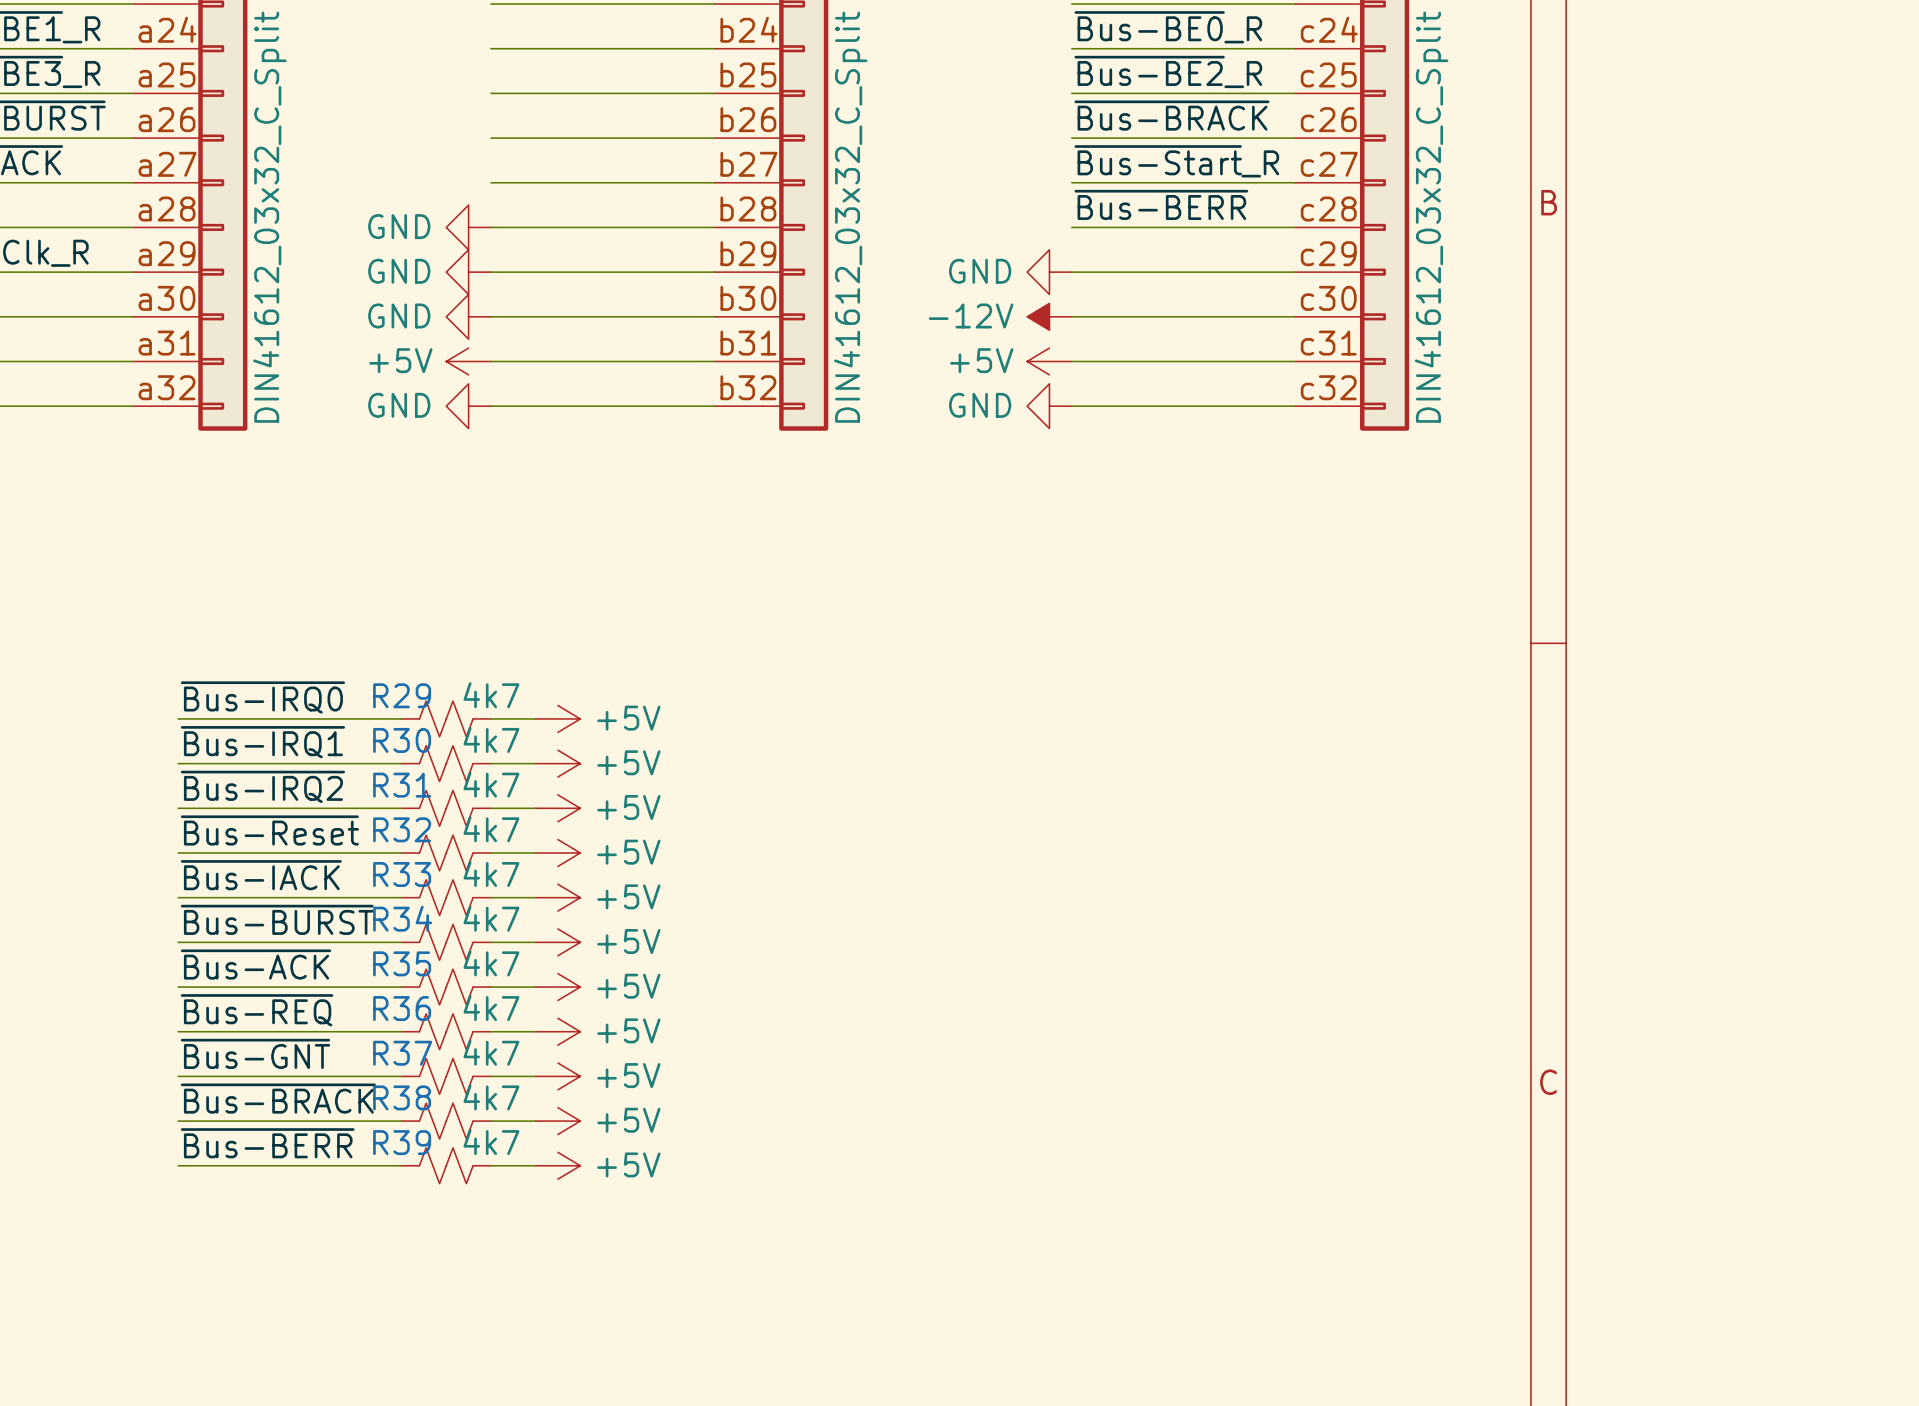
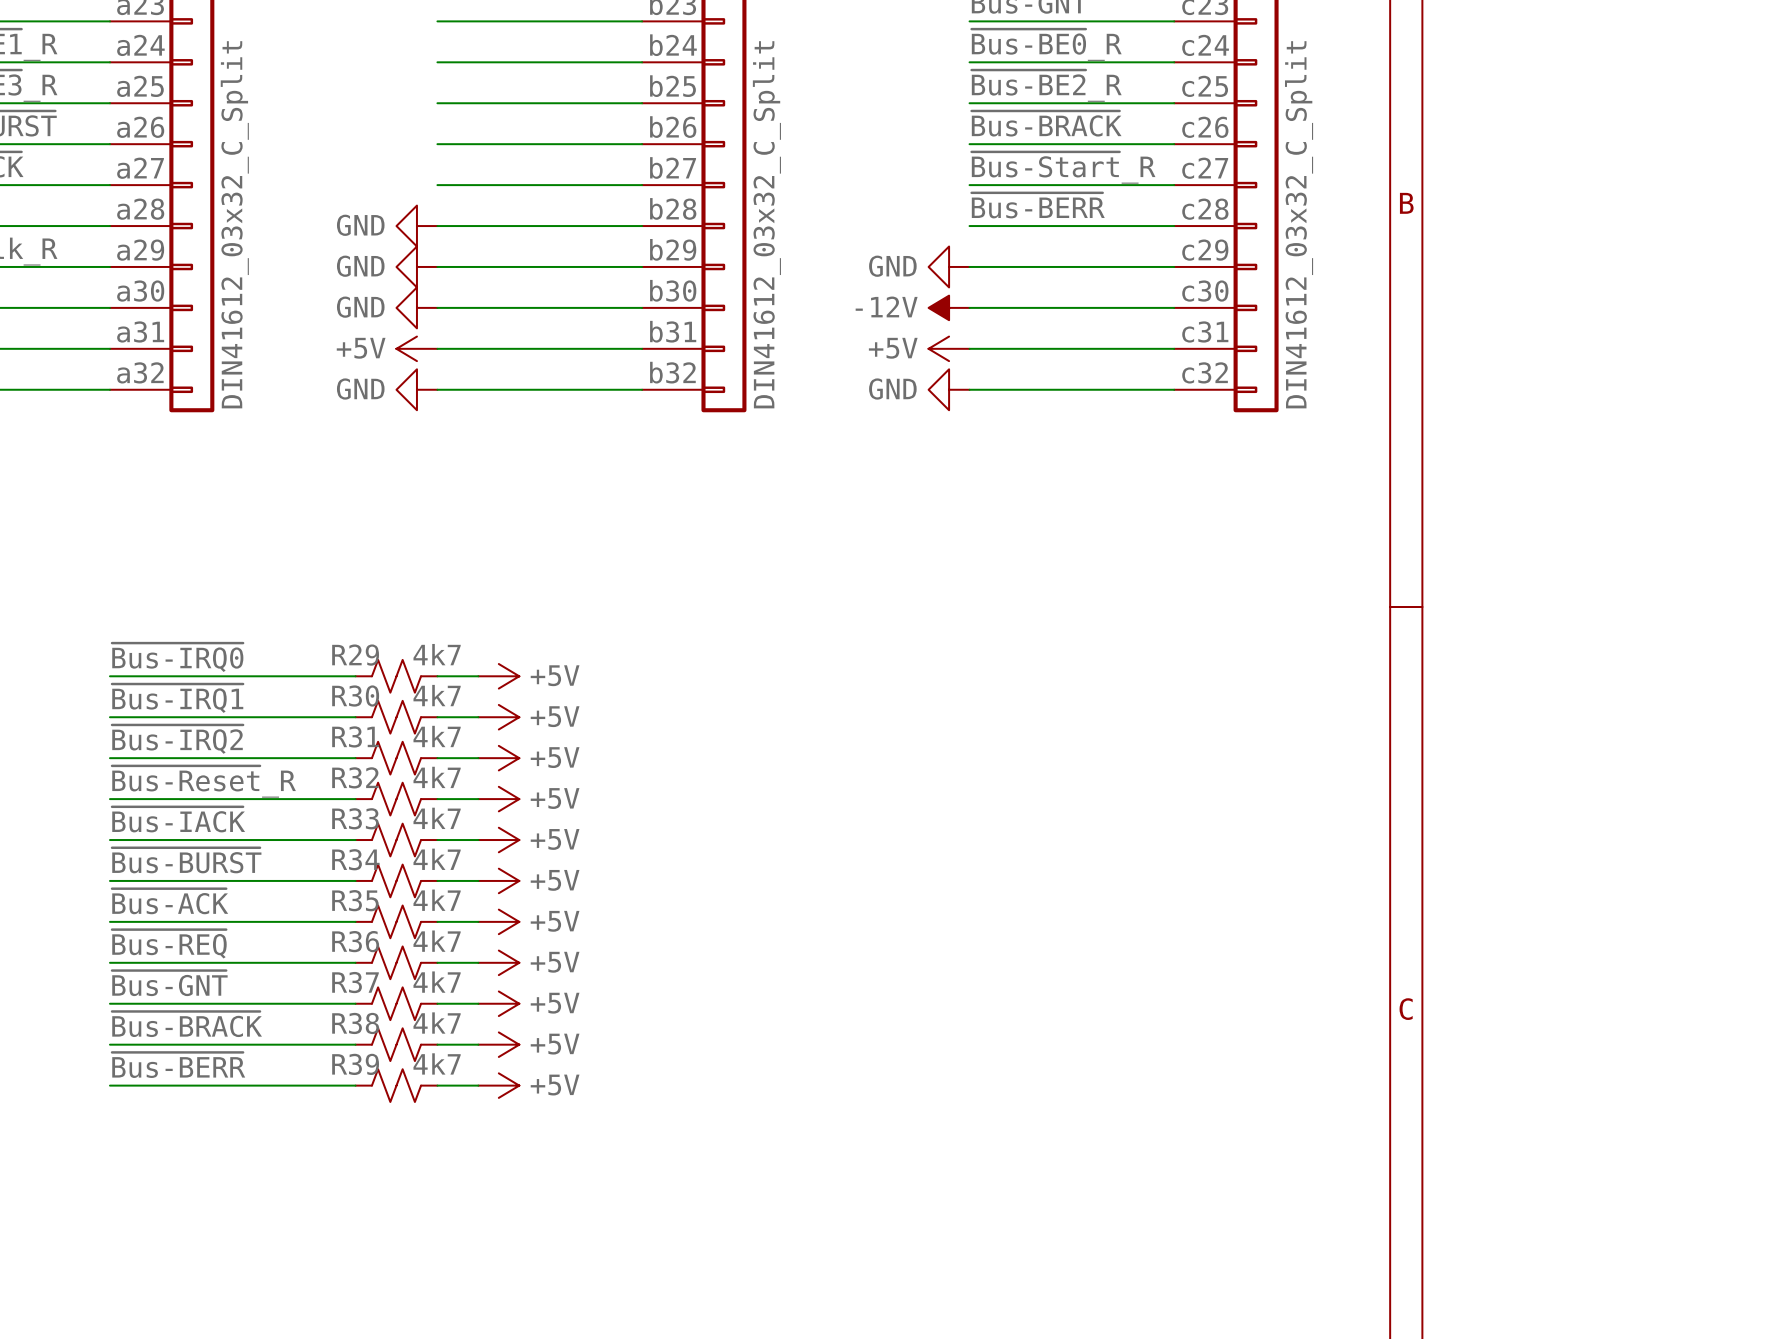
label position: ~{Bus-IRQ0} (262, 697) -> ~{Bus-IRQ0} (177, 657)
wire: none -> (109, 676) (150, 676)
label position: ~{Bus-IRQ1} (262, 742) -> ~{Bus-IRQ1} (177, 698)
wire: none -> (109, 717) (150, 717)
label position: ~{Bus-IRQ2} (262, 786) -> ~{Bus-IRQ2} (177, 739)
wire: none -> (109, 758) (150, 758)
label: ~{Bus-Reset} (269, 830) -> ~{Bus-Reset}_R (203, 781)
wire: none -> (109, 799) (150, 799)
label position: ~{Bus-IACK} (261, 875) -> ~{Bus-IACK} (178, 819)
wire: none -> (109, 840) (150, 840)
label position: ~{Bus-BURST} (277, 919) -> ~{Bus-BURST} (186, 860)
wire: none -> (109, 880) (150, 880)
label position: ~{Bus-ACK} (256, 964) -> ~{Bus-ACK} (170, 901)
wire: none -> (109, 921) (150, 921)
label position: ~{Bus-REQ} (257, 1010) -> ~{Bus-REQ} (169, 944)
wire: none -> (109, 962) (150, 962)
label position: ~{Bus-GNT} (255, 1053) -> ~{Bus-GNT} (169, 983)
wire: none -> (109, 1003) (150, 1003)
label position: ~{Bus-BRACK} (278, 1098) -> ~{Bus-BRACK} (186, 1024)
wire: none -> (109, 1044) (150, 1044)
label position: ~{Bus-BERR} (267, 1143) -> ~{Bus-BERR} (178, 1065)
wire: none -> (109, 1085) (150, 1085)

